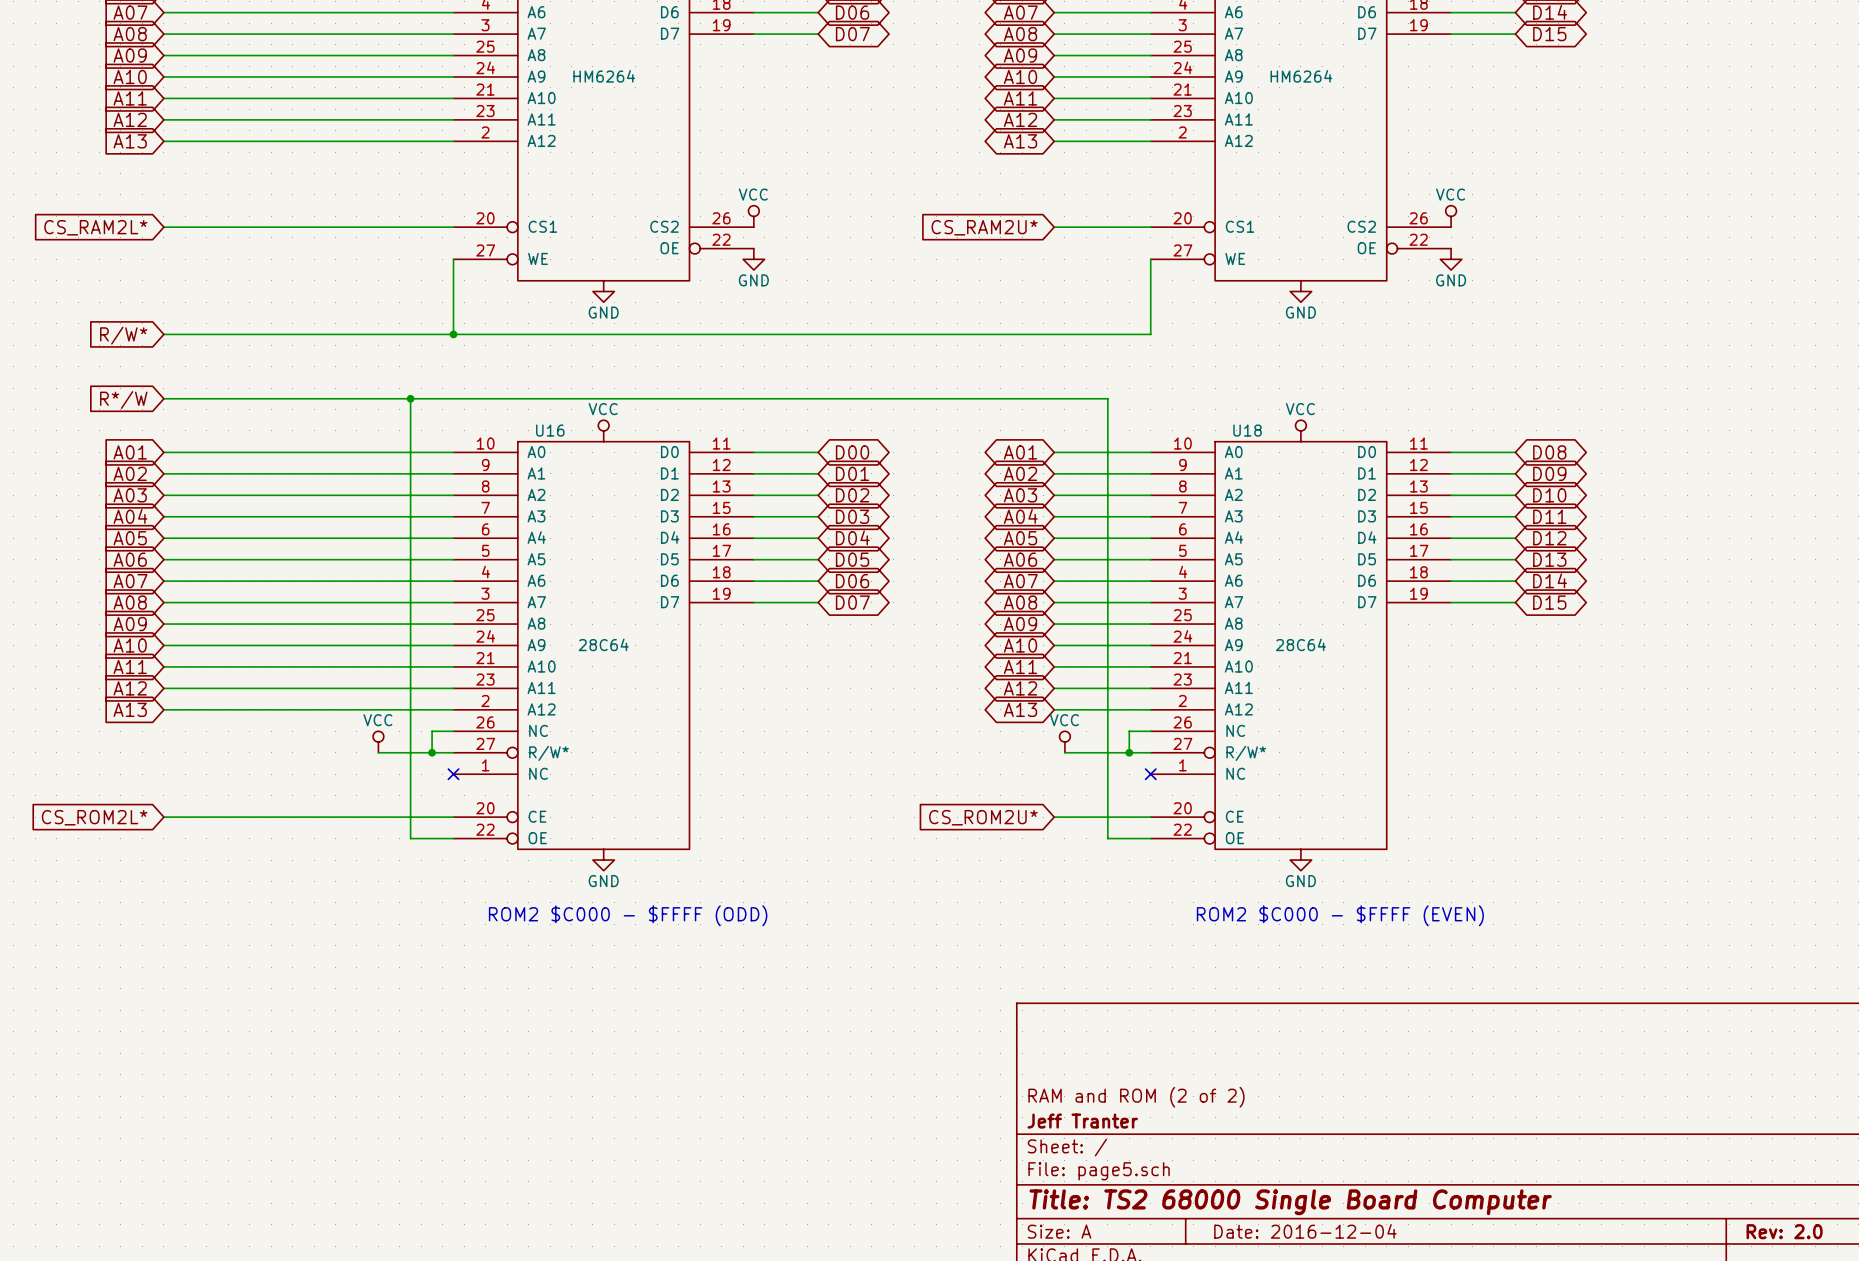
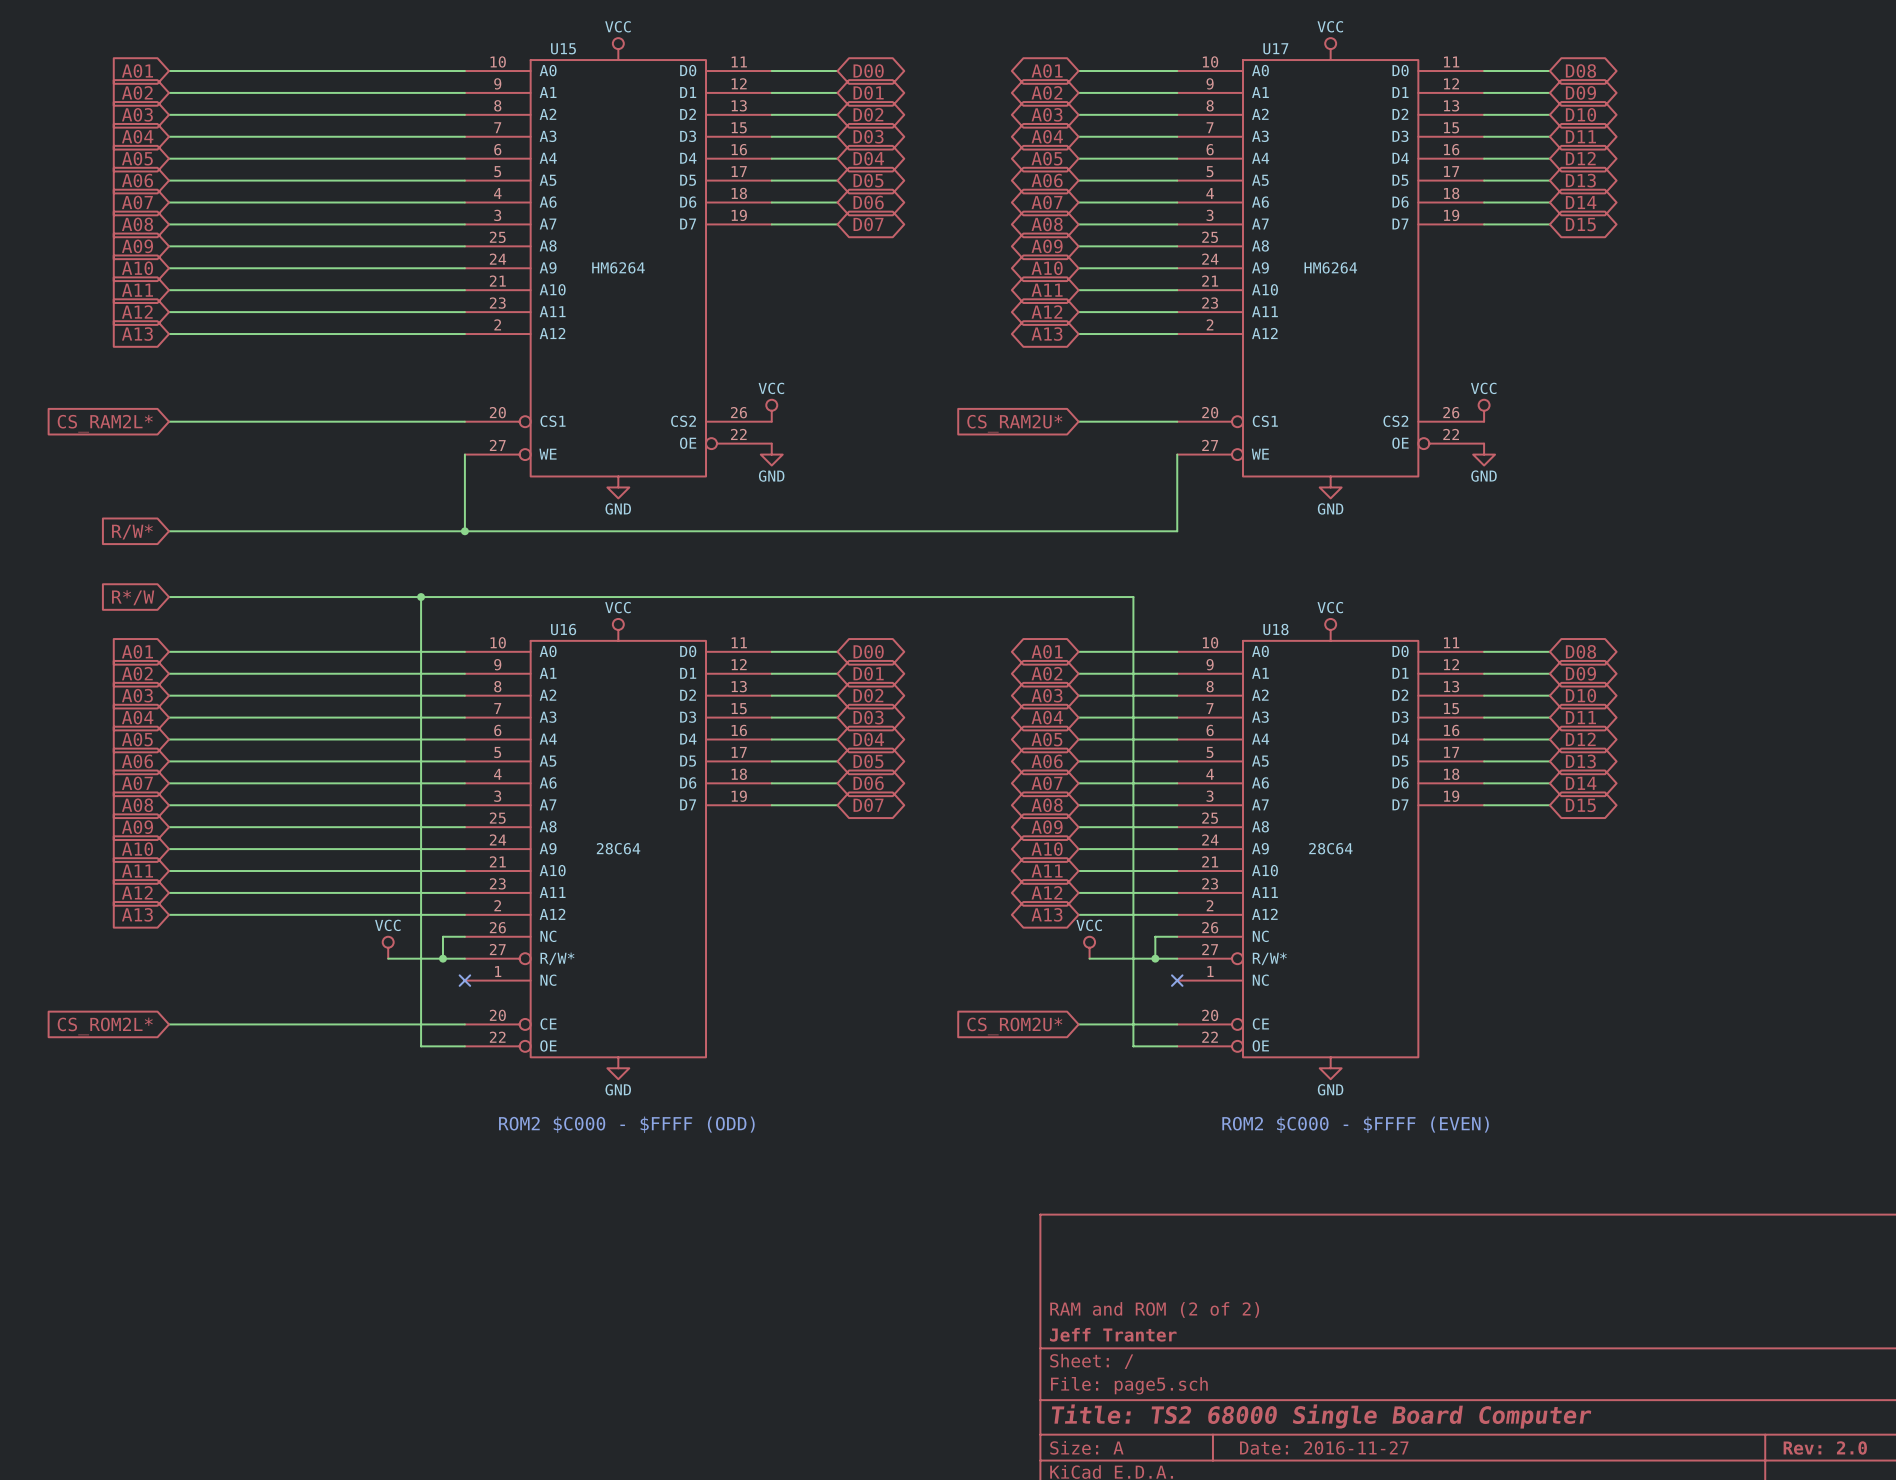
title block: Date: 2016-12-04 (1305, 1231) -> Date: 2016-11-27 (1324, 1447)

